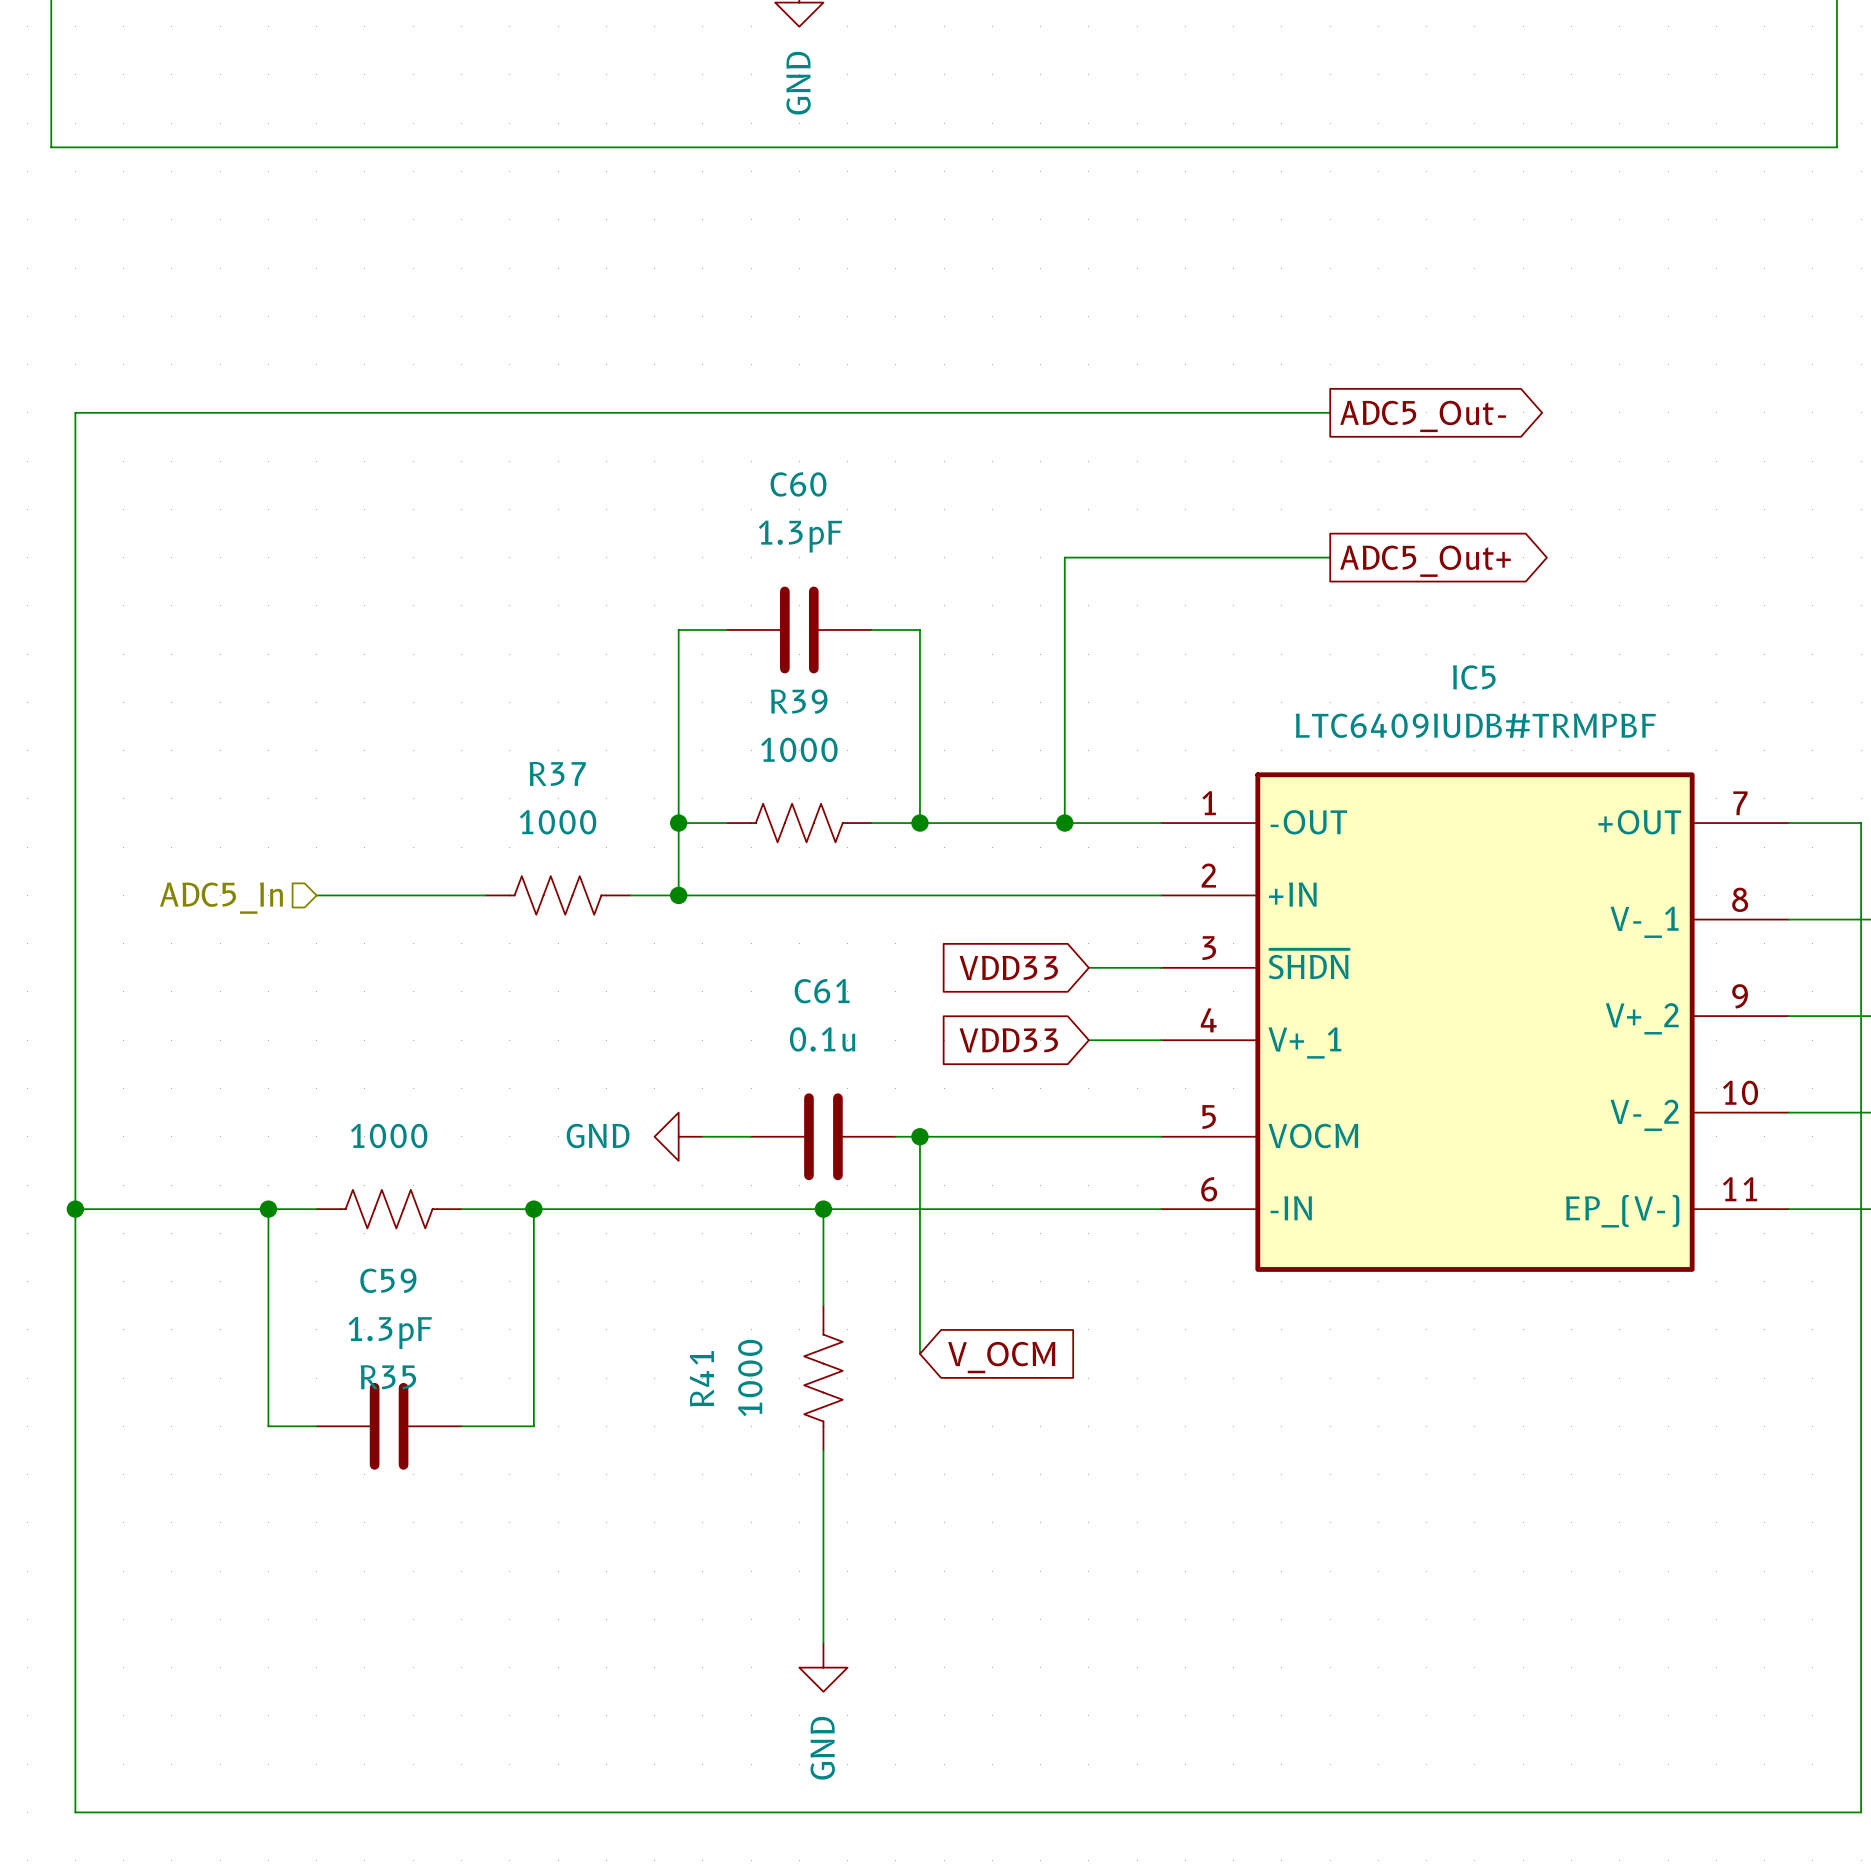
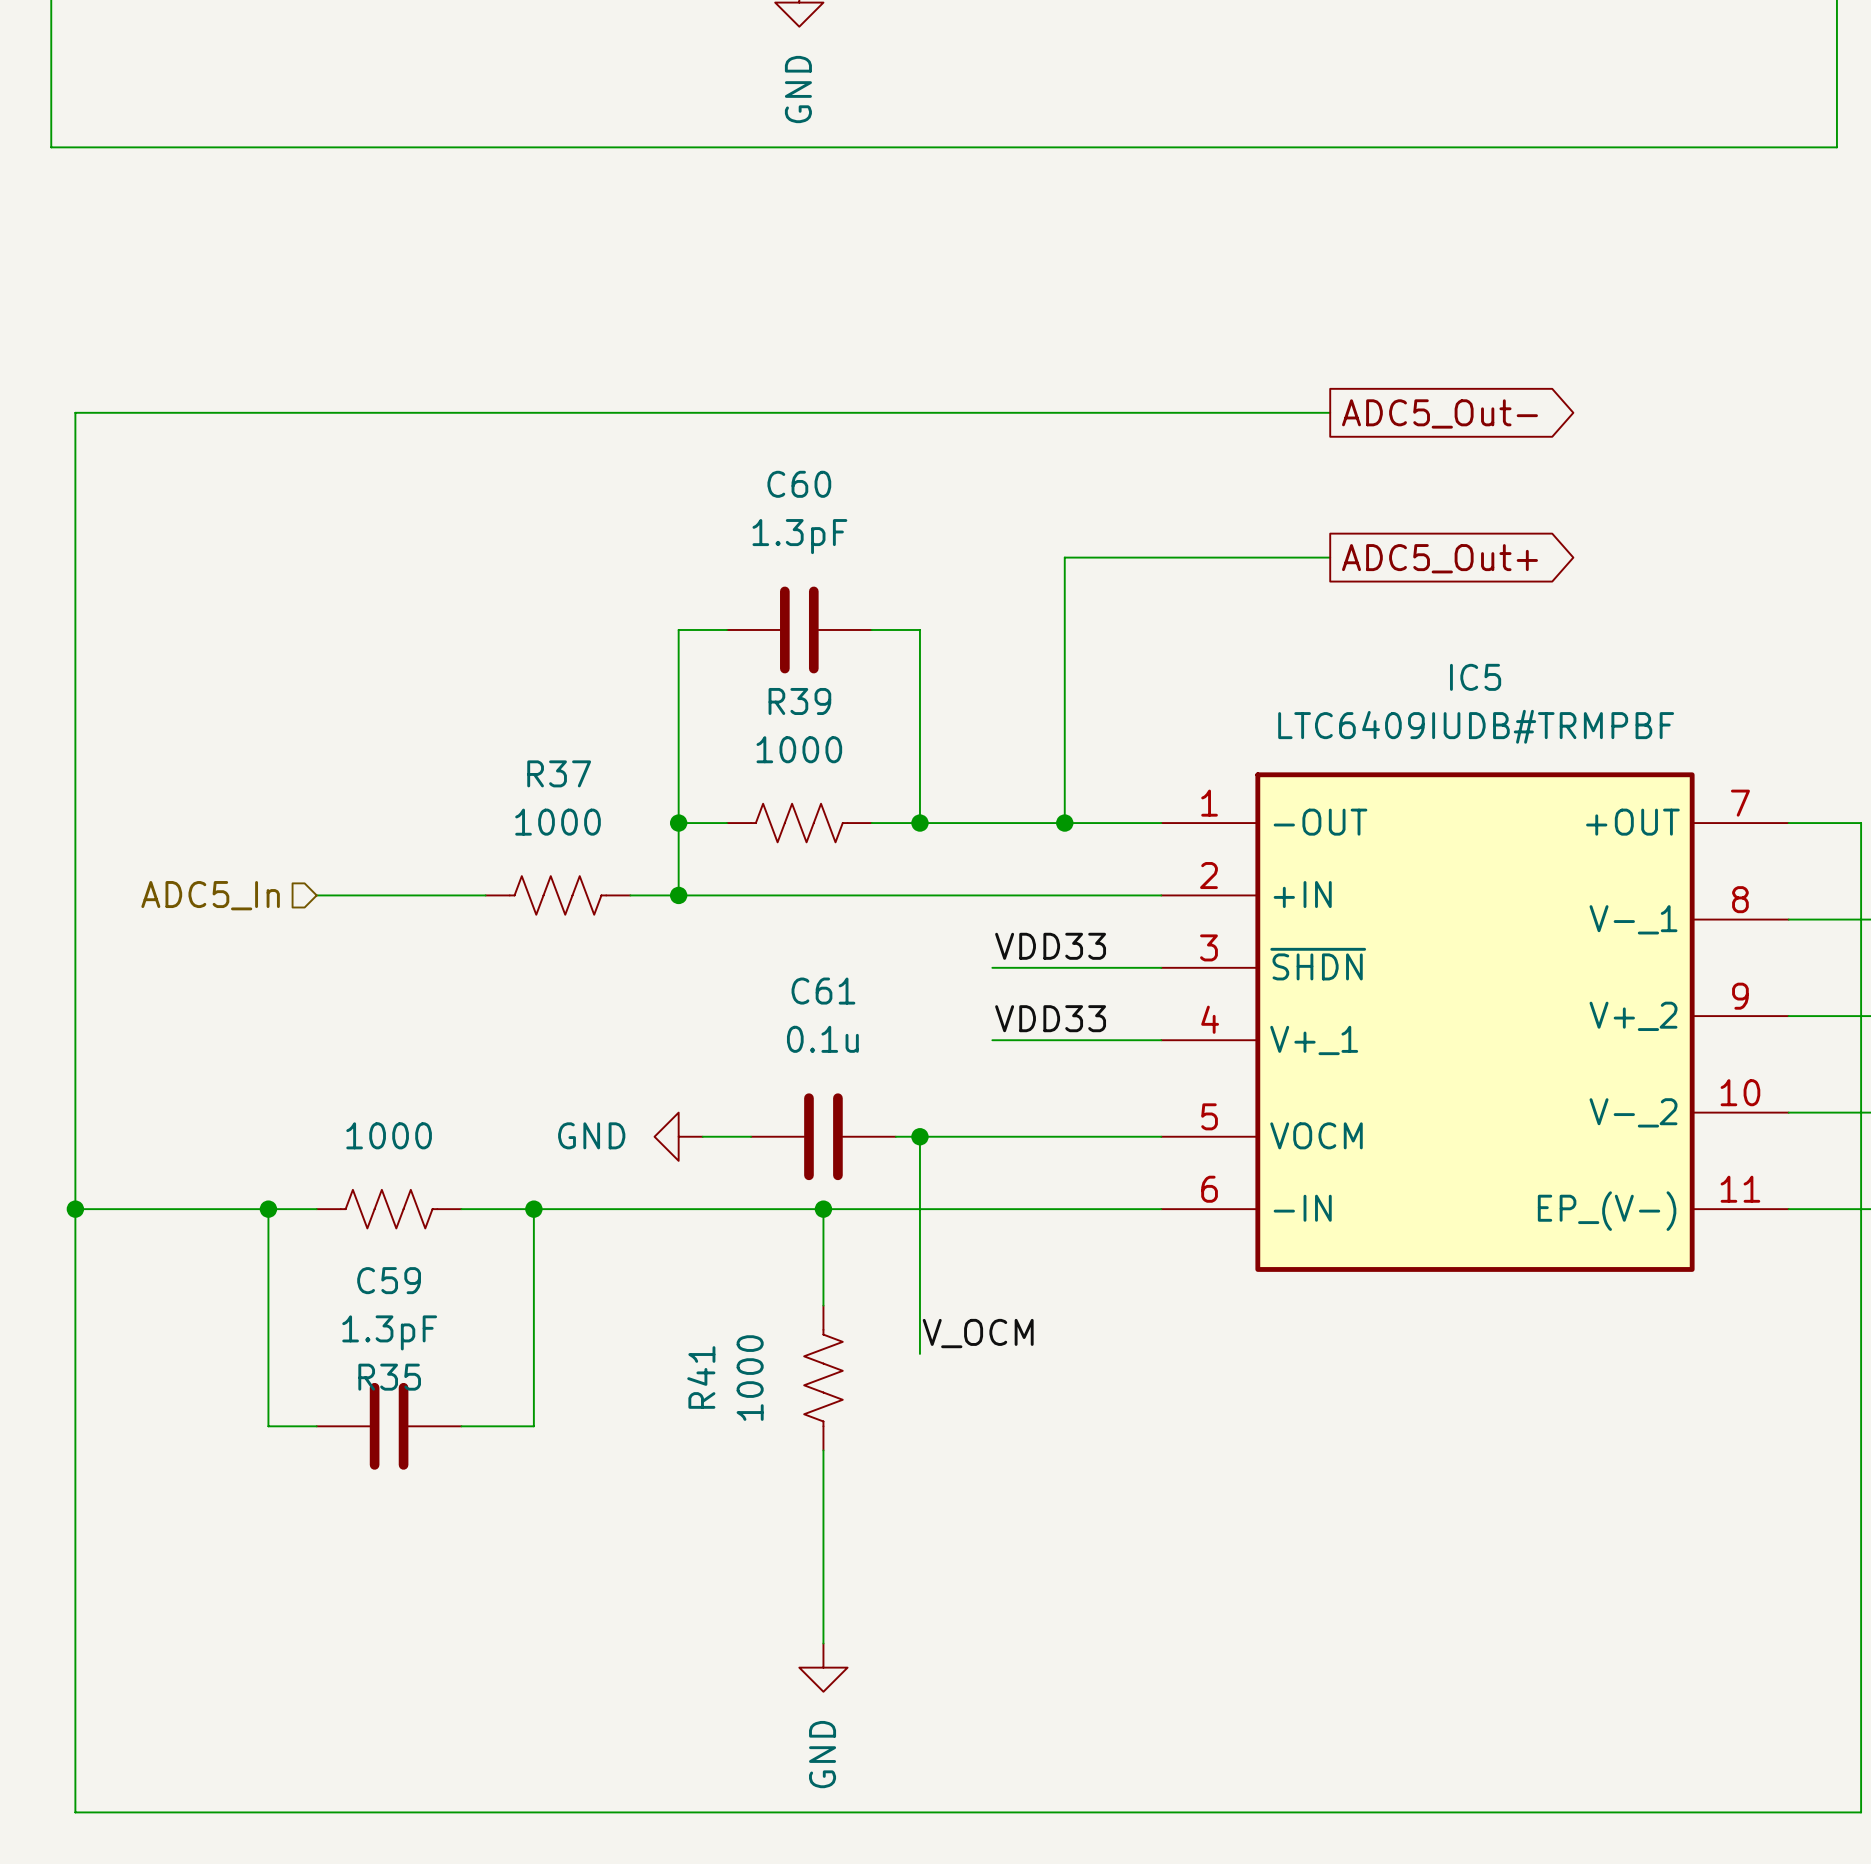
label: none -> VDD33 (1050, 946)
wire: none -> (992, 967) (1088, 967)
global label: VDD33 (1008, 967) -> none
label: none -> VDD33 (1050, 1018)
wire: none -> (992, 1040) (1088, 1040)
global label: VDD33 (1008, 1040) -> none
label: none -> V_OCM (978, 1333)
global label: V_OCM (1001, 1357) -> none

